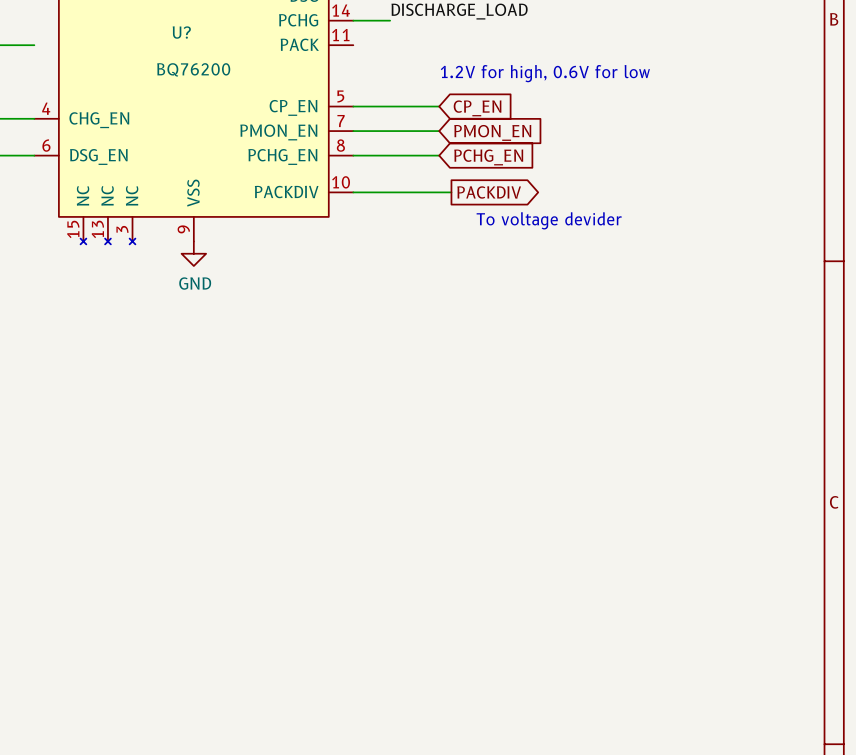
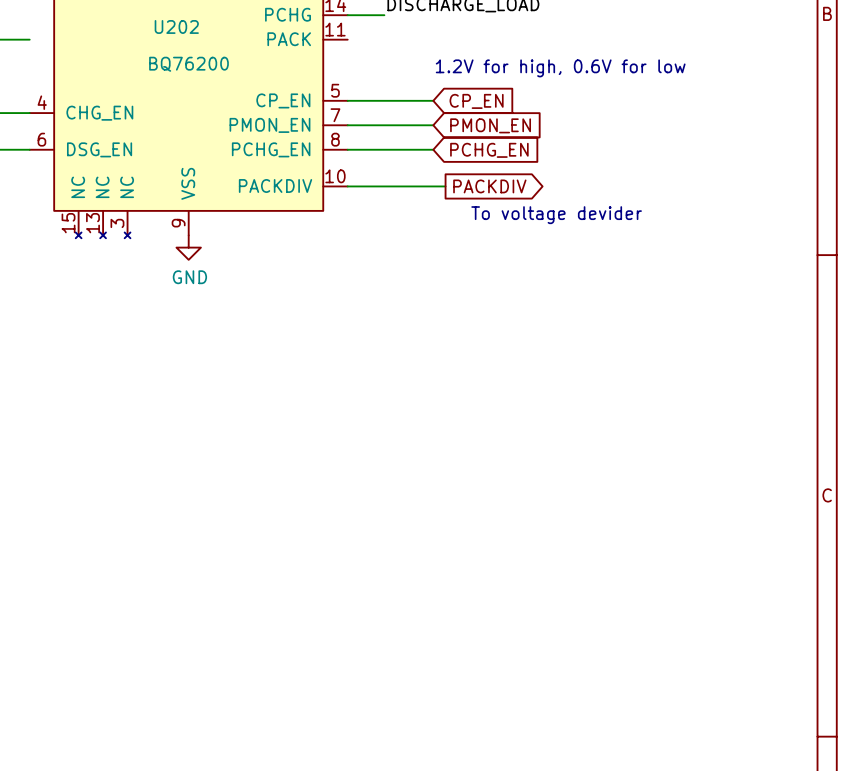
U? name: U? (181, 32) -> U202 (176, 26)

